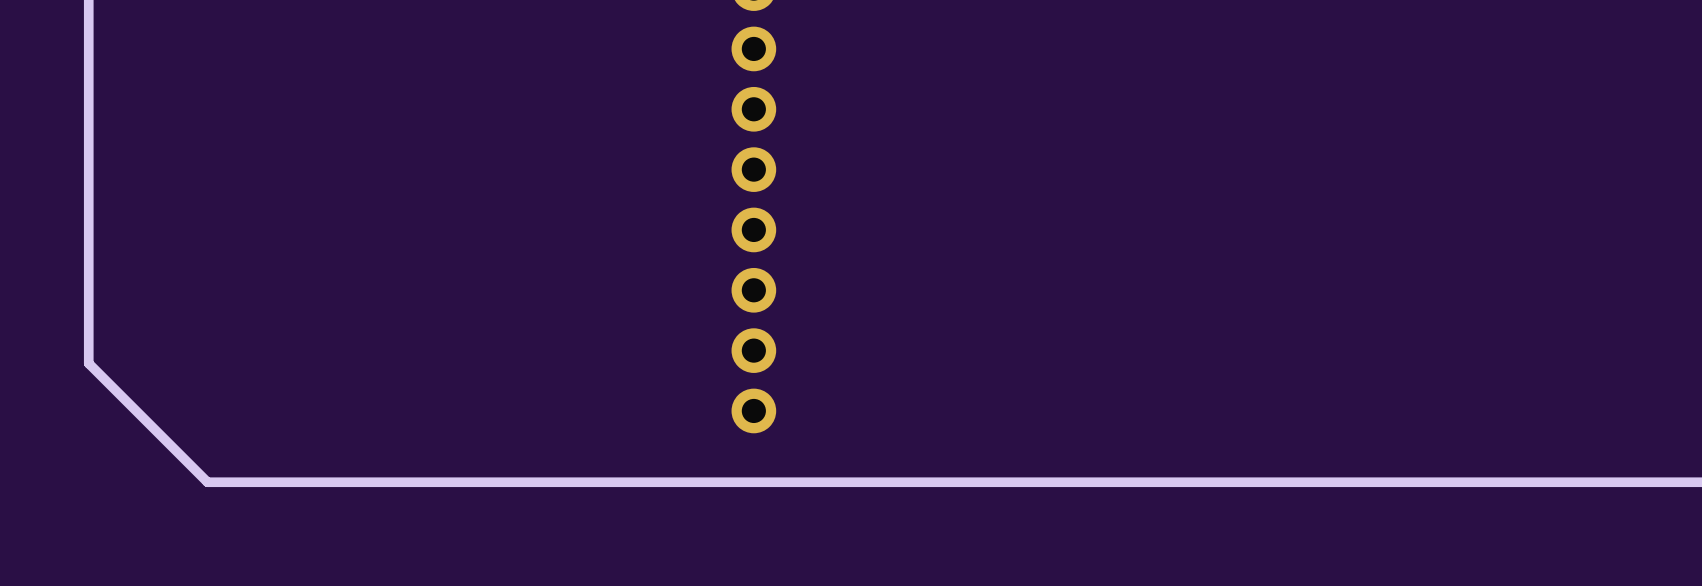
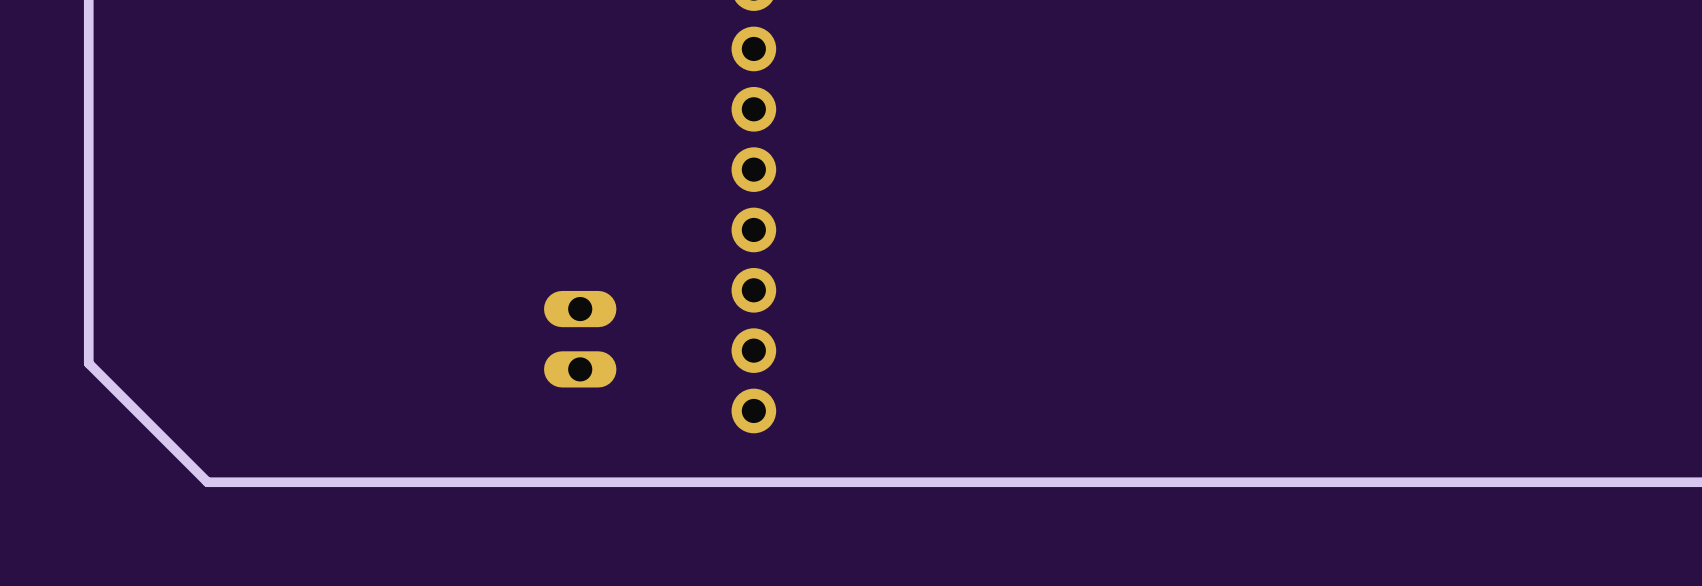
part: none -> (580, 339)

